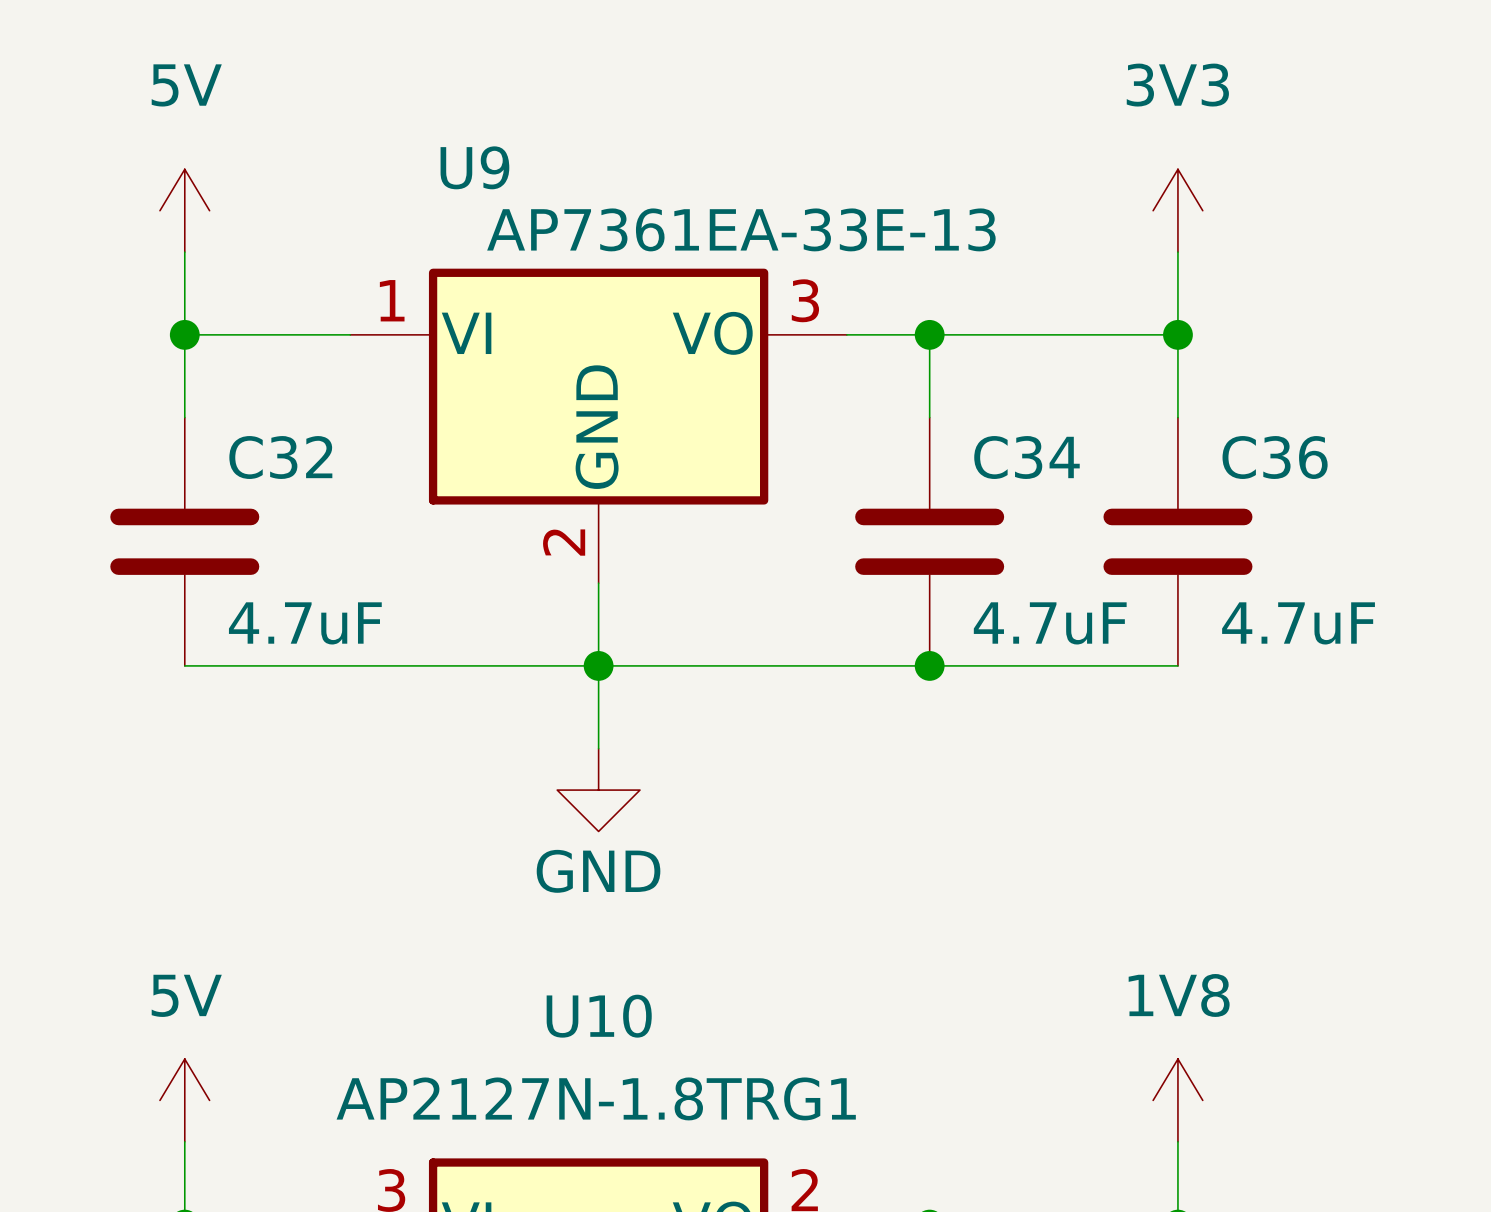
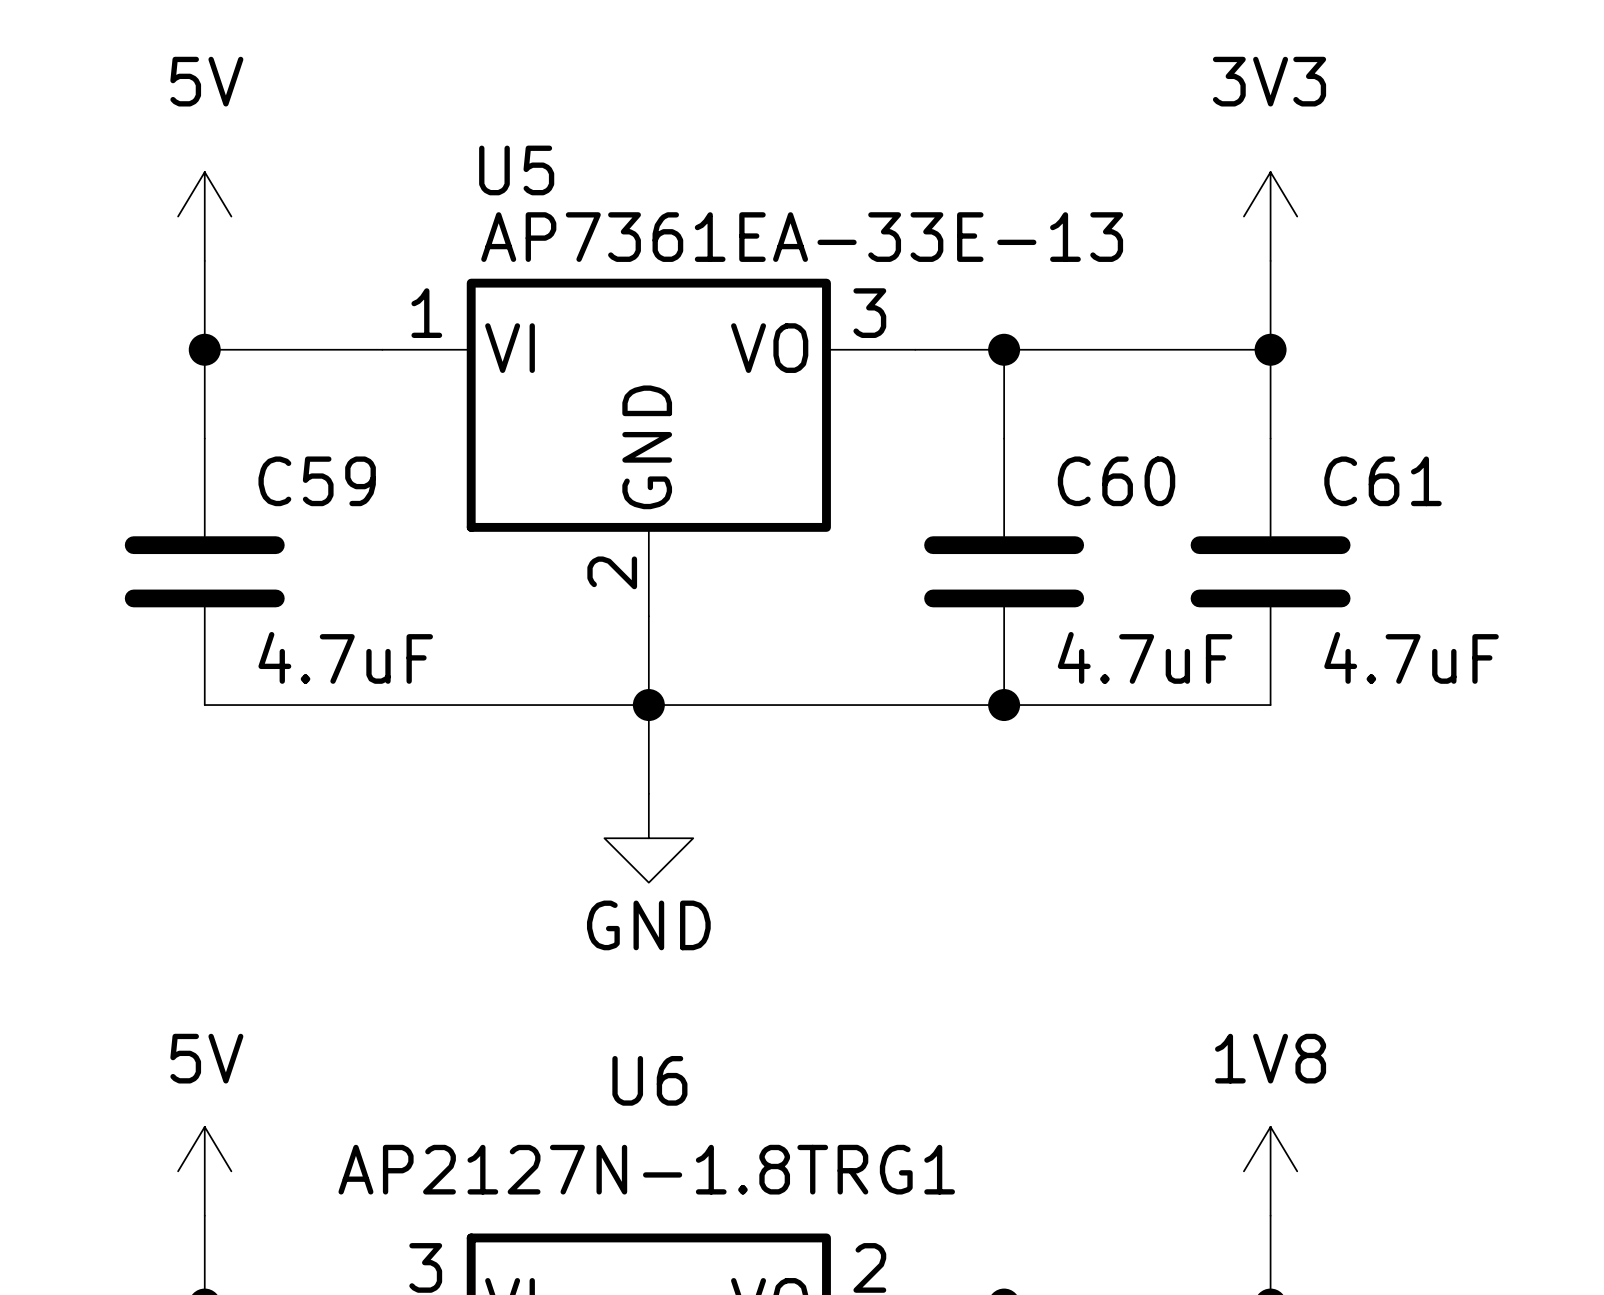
U9 name: U9 (474, 167) -> U5 (516, 170)
C32 name: C32 (280, 457) -> C59 (317, 481)
C34 name: C34 (1026, 457) -> C60 (1116, 481)
C36 name: C36 (1275, 457) -> C61 (1382, 481)
U10 name: U10 (599, 1016) -> U6 (649, 1080)

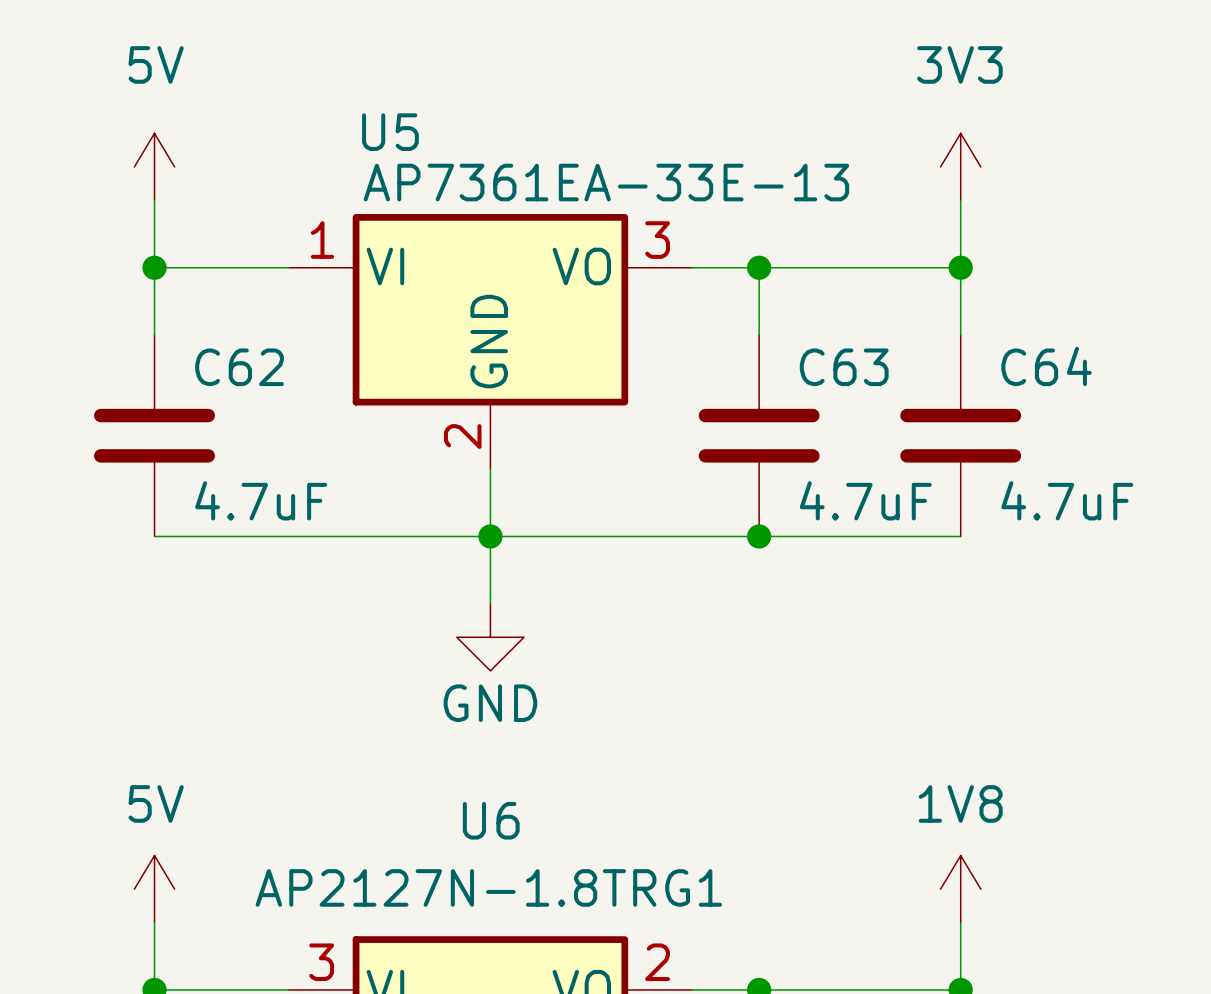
C59 name: C59 (317, 481) -> C62 (239, 367)
C60 name: C60 (1116, 481) -> C63 (844, 367)
C61 name: C61 (1382, 481) -> C64 (1046, 366)

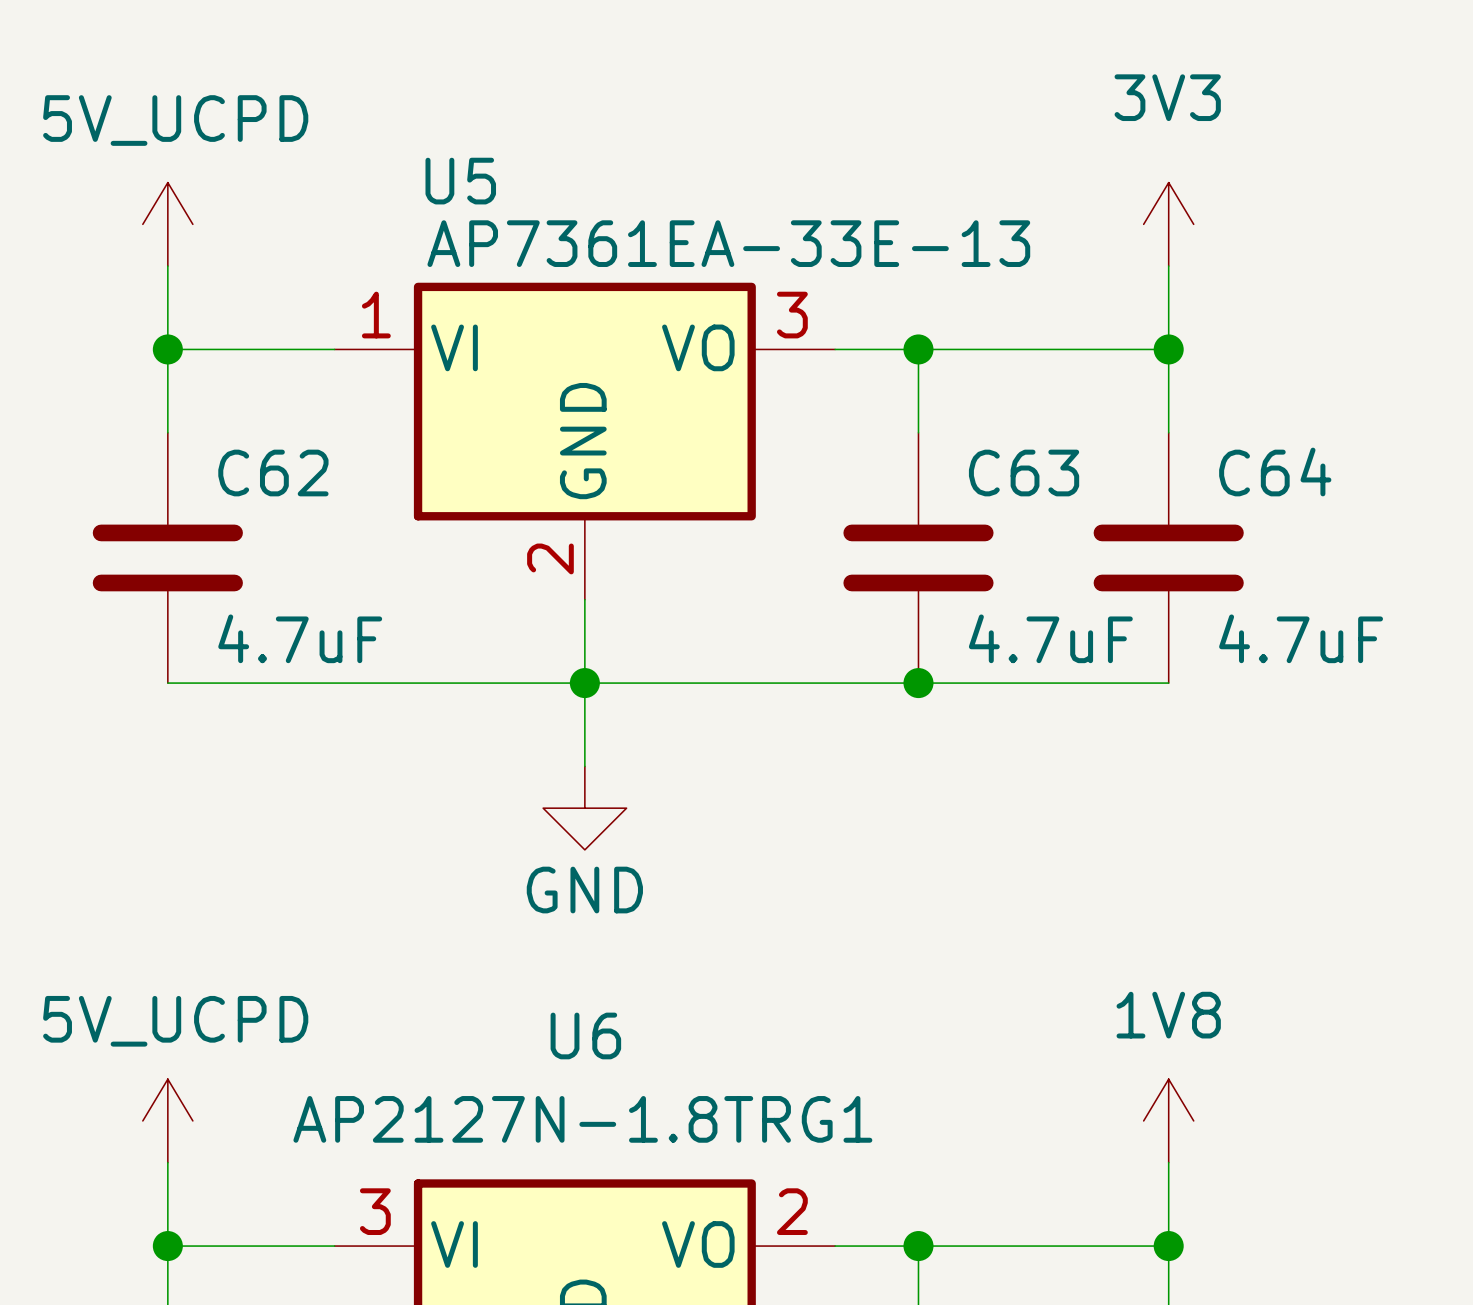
power symbol: 5V (154, 166) -> 5V_UCPD (167, 224)
power symbol: 5V (154, 889) -> 5V_UCPD (167, 1120)

